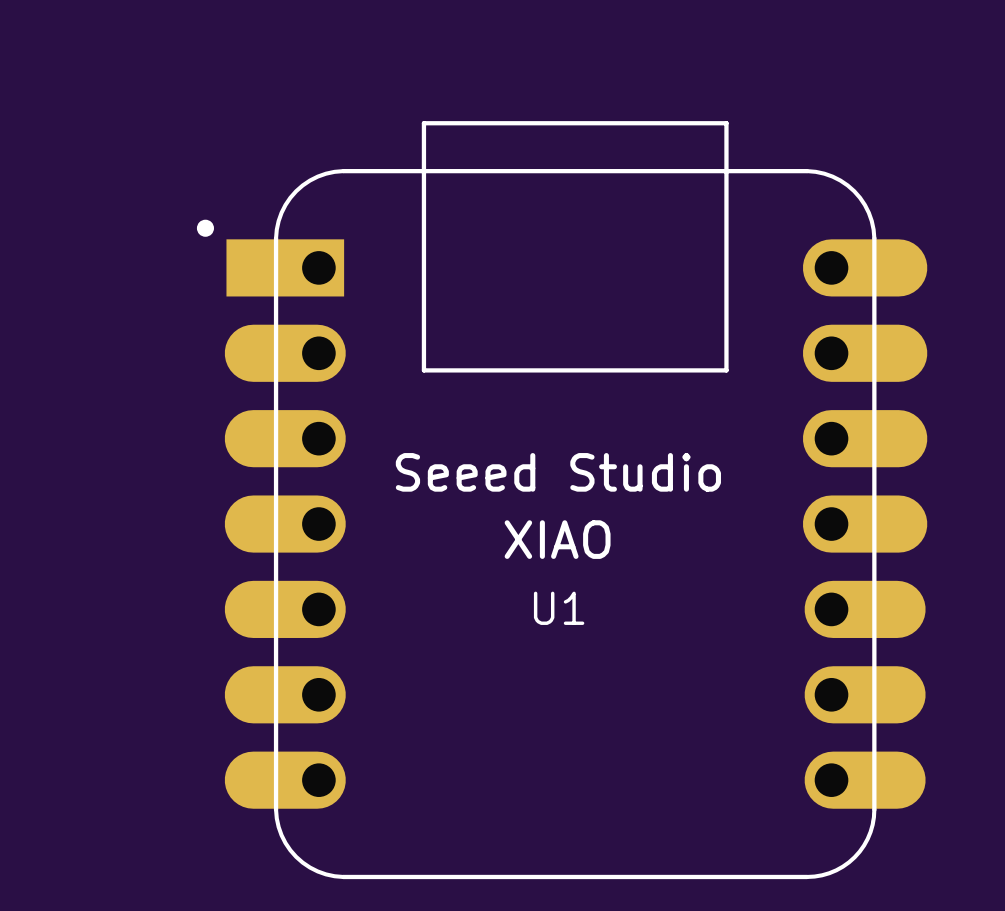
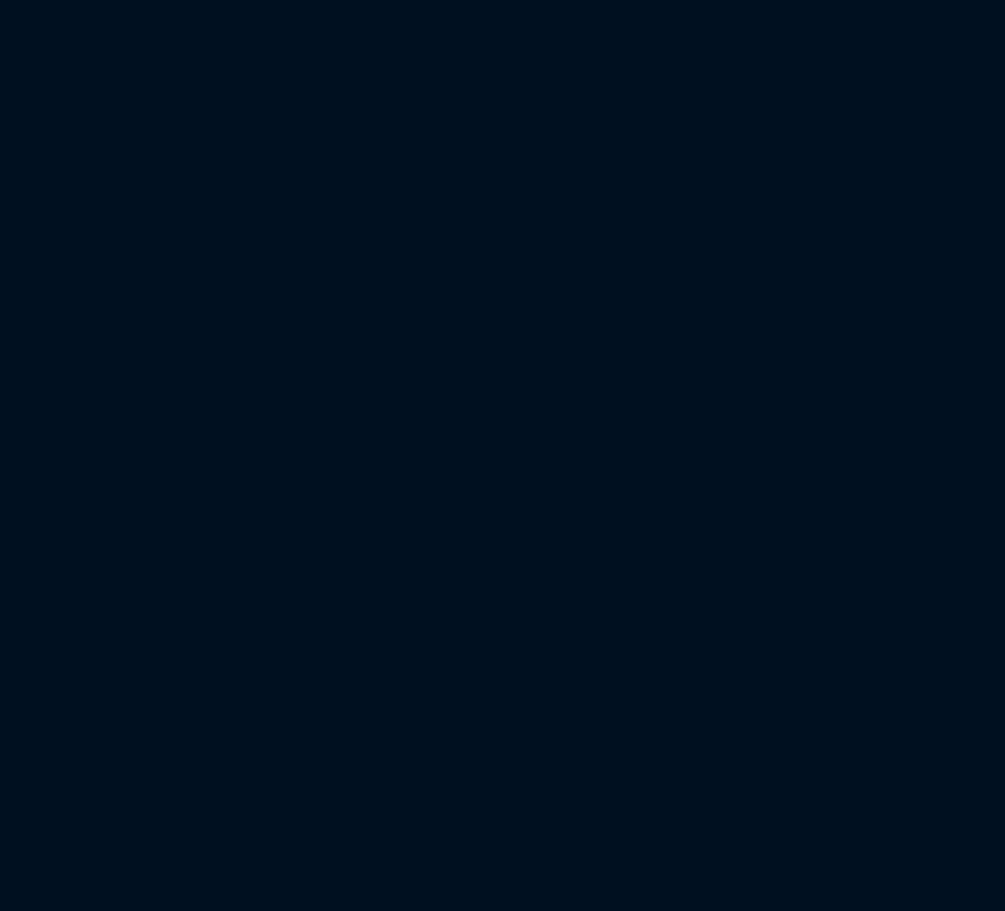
U1: (562, 500) -> none

